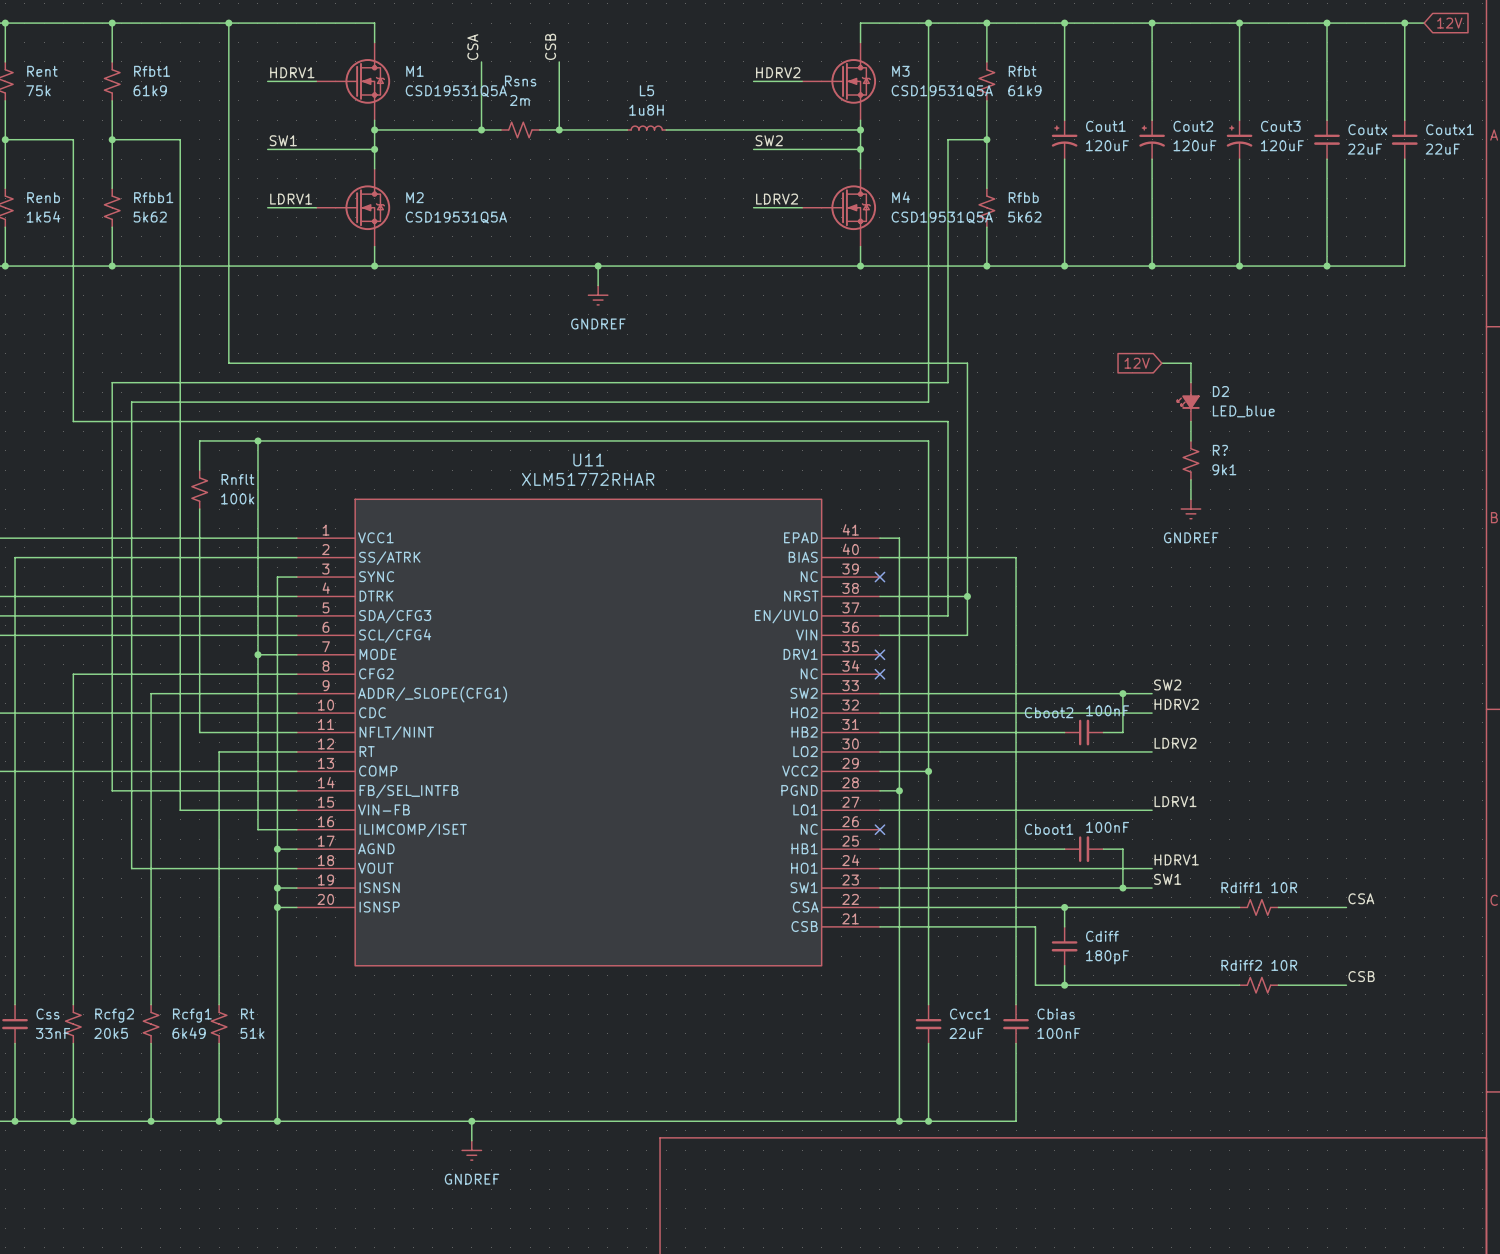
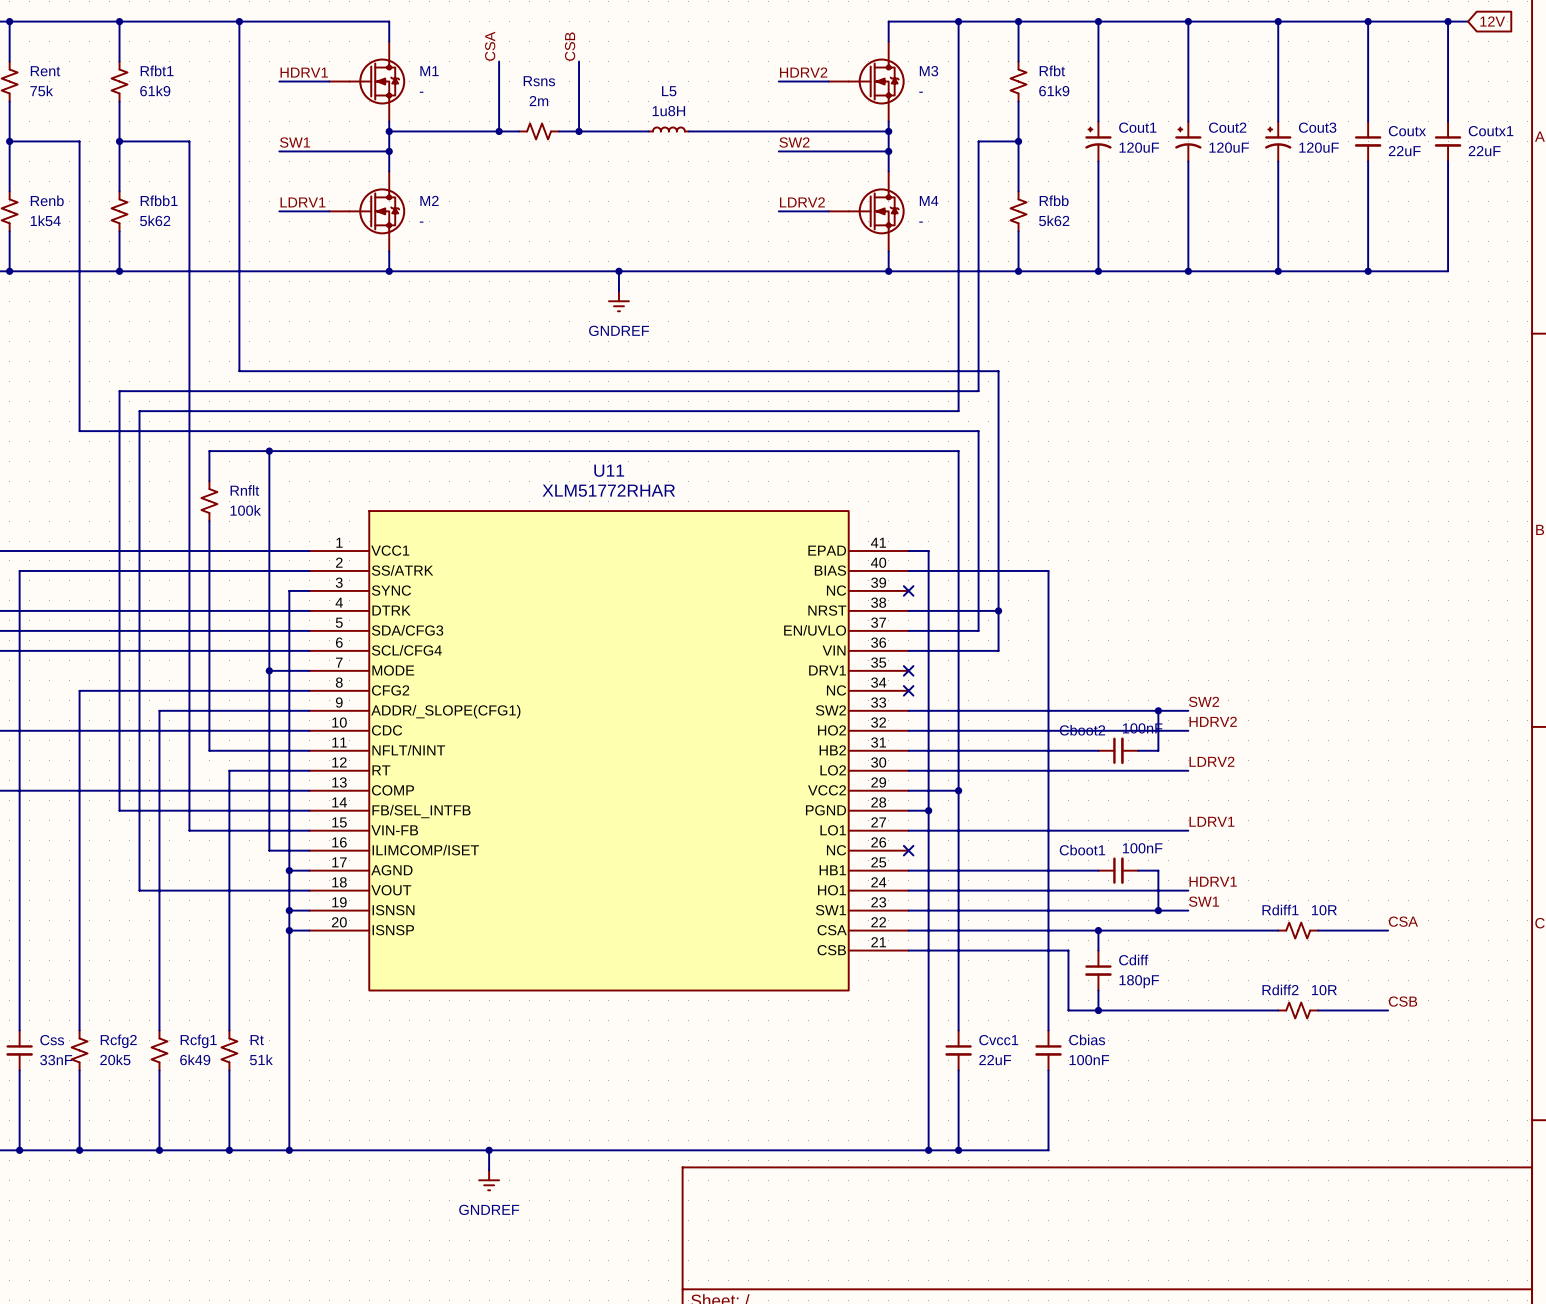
M1 value: CSD19531Q5A (456, 91) -> - (421, 92)
M3 value: CSD19531Q5A (942, 91) -> - (921, 92)
M2 value: CSD19531Q5A (456, 217) -> - (421, 222)
M4 value: CSD19531Q5A (942, 217) -> - (921, 222)
global label: 12V (1137, 363) -> none
wire: (1161, 363) (1190, 363) (1190, 382) -> none
D2: LED_blue (1188, 402) -> none
wire: (1190, 421) (1190, 440) -> none
R?: 9k1 (1190, 460) -> none
wire: (1190, 479) (1190, 499) -> none
power symbol: GNDREF (1190, 509) -> none

